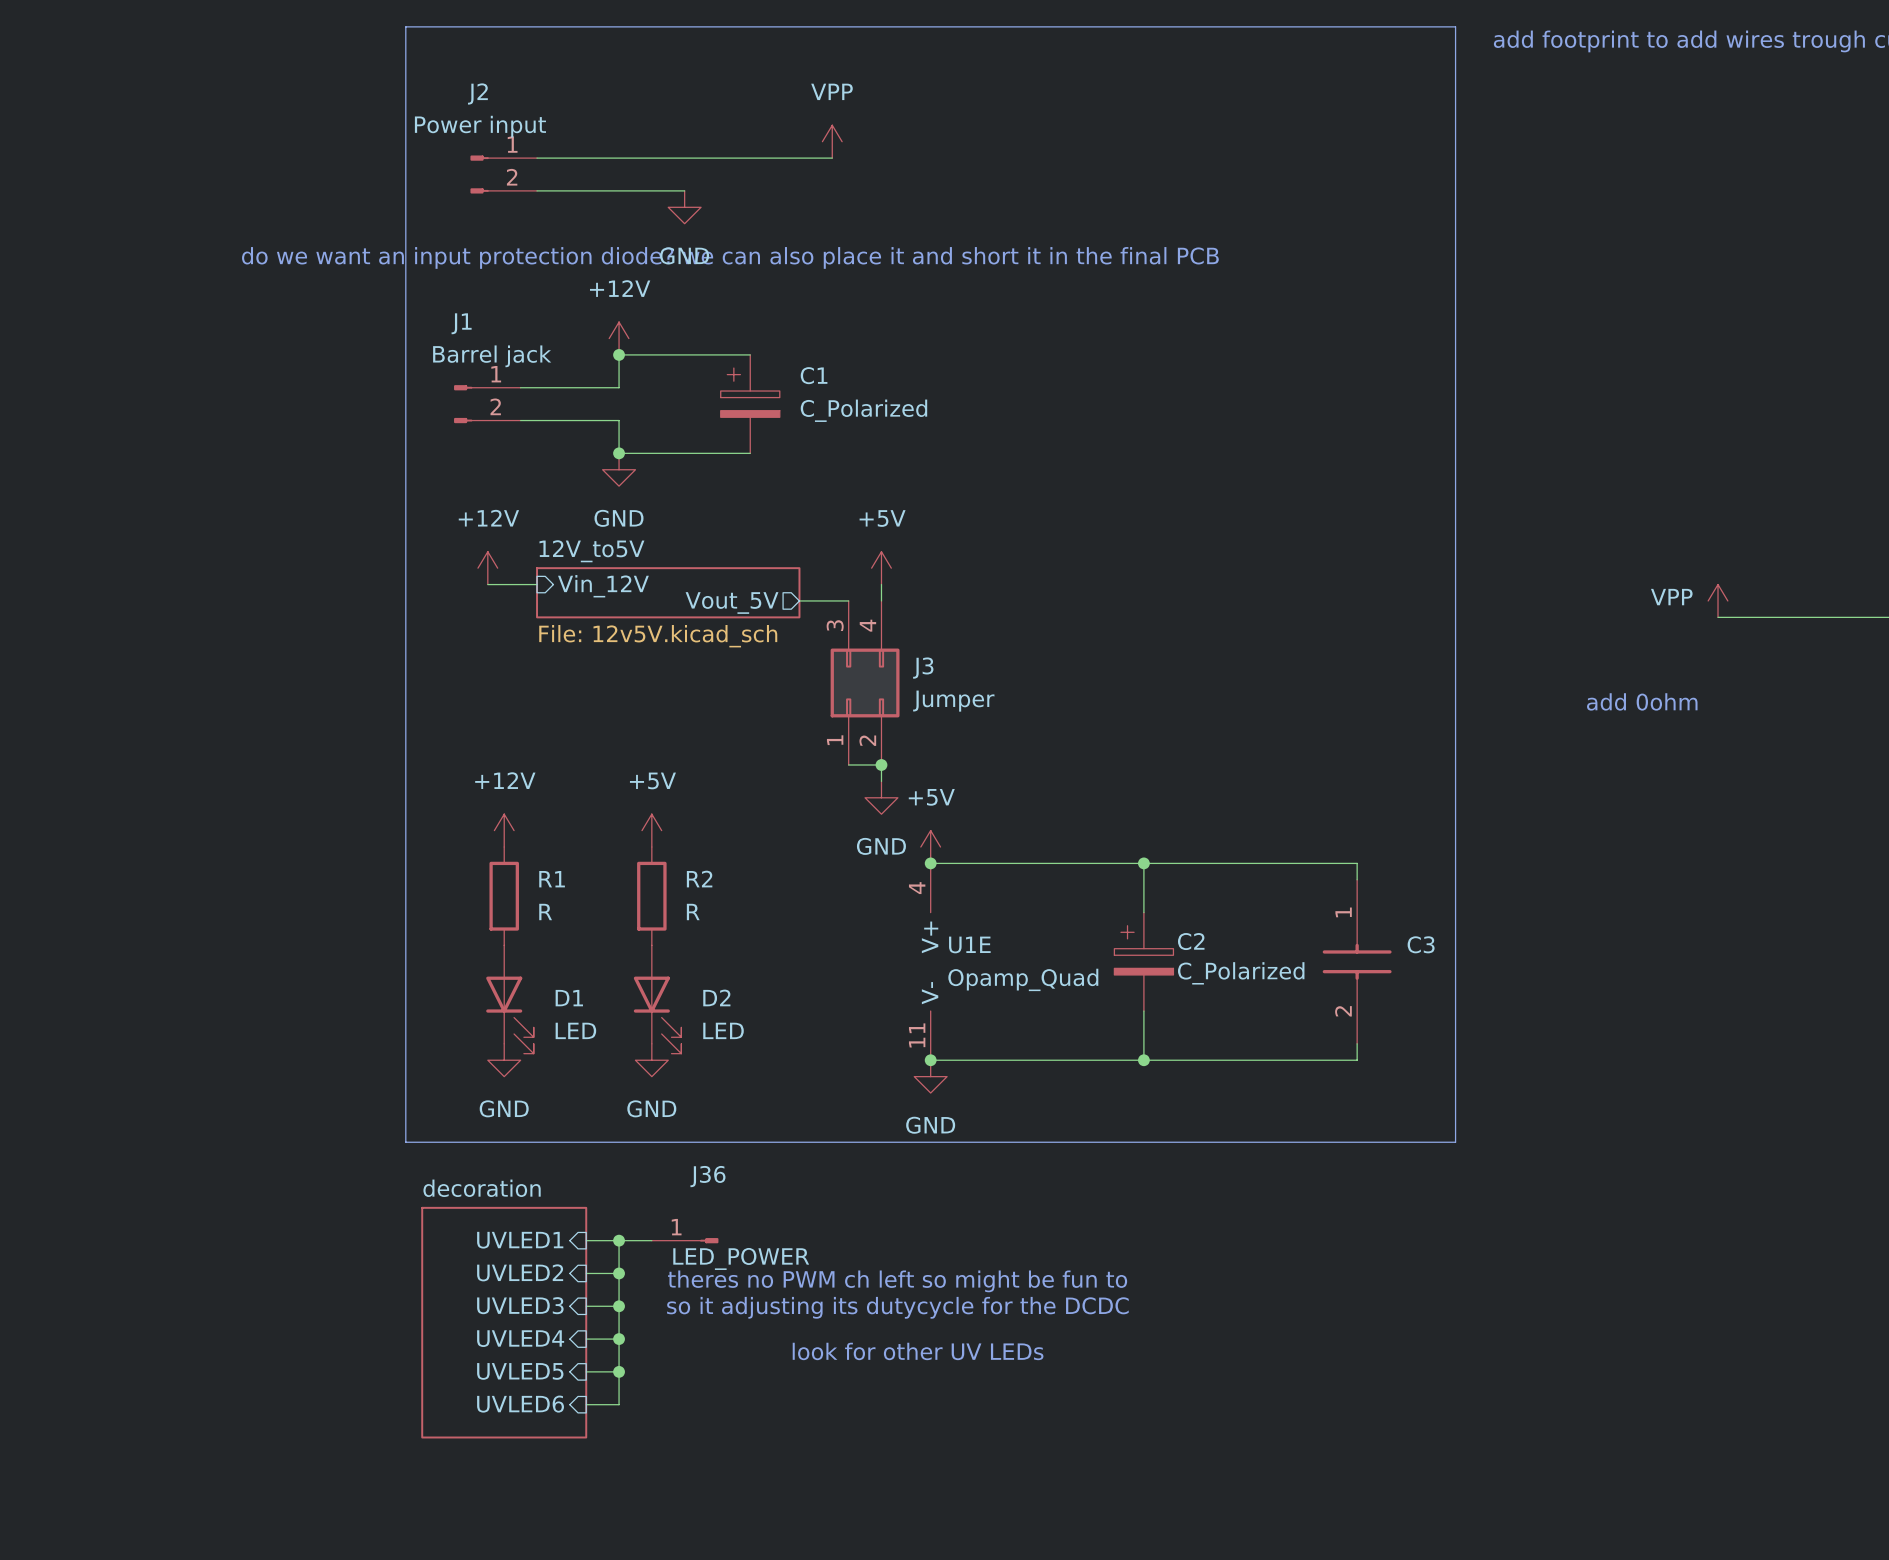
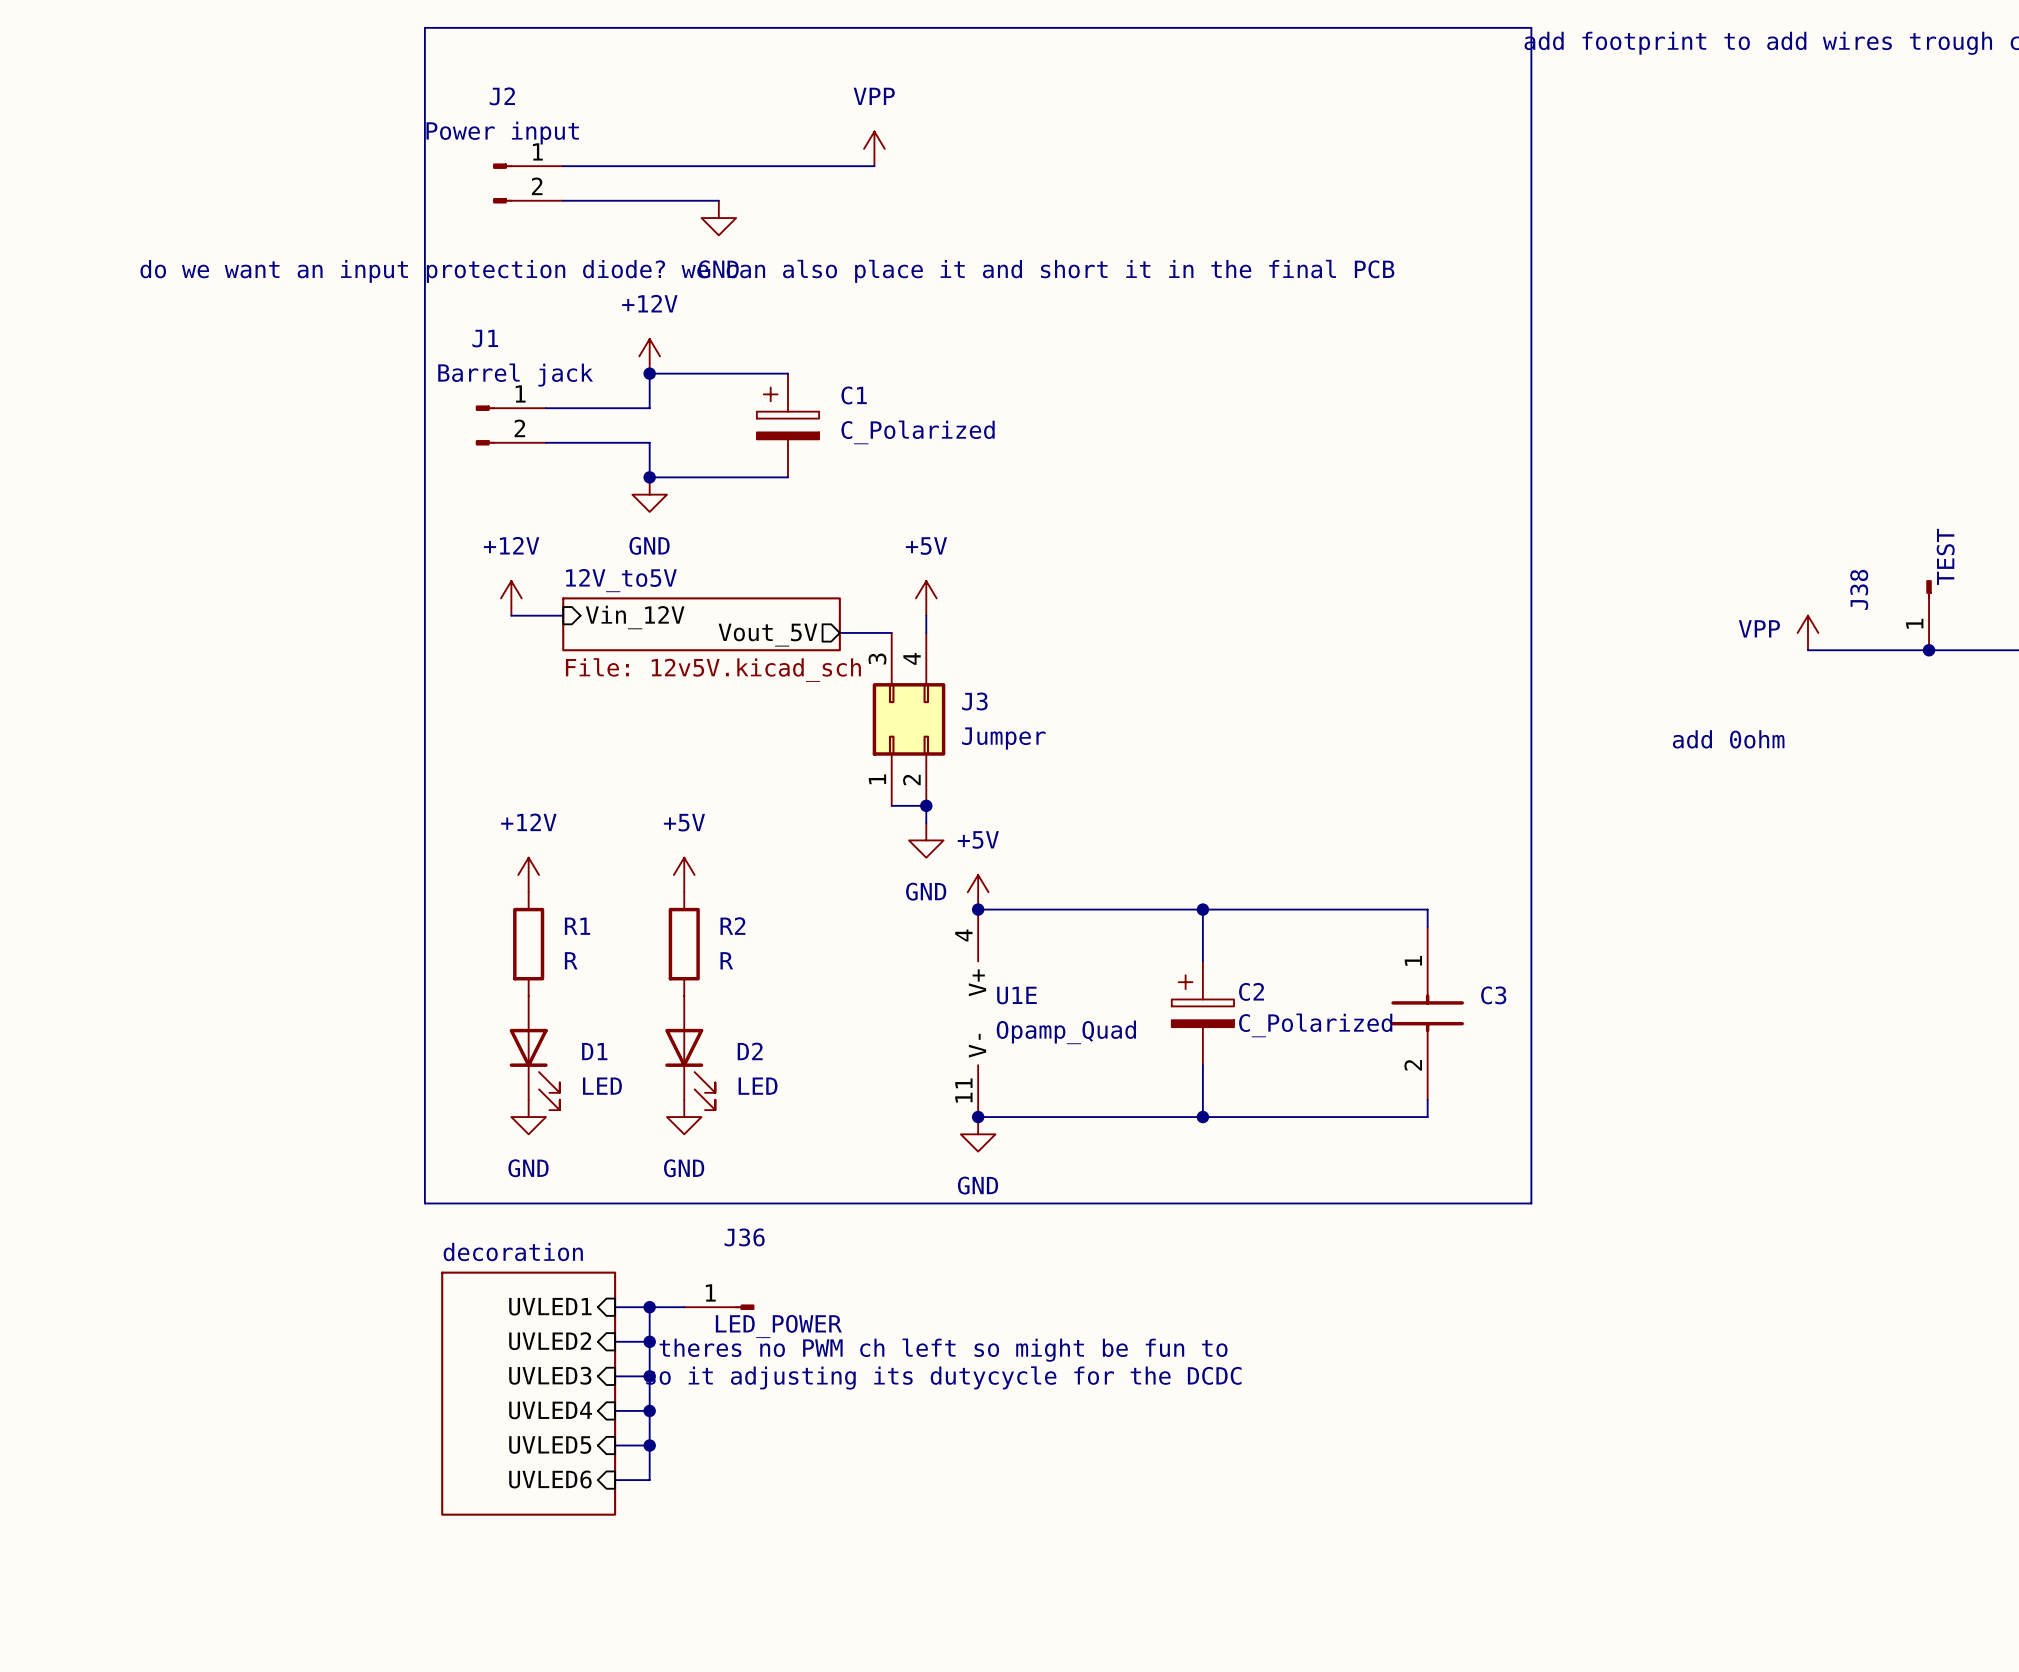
J38: none -> TEST (1929, 615)
junction: none -> (1929, 650)
text: look for other UV LEDs (918, 1351) -> none

